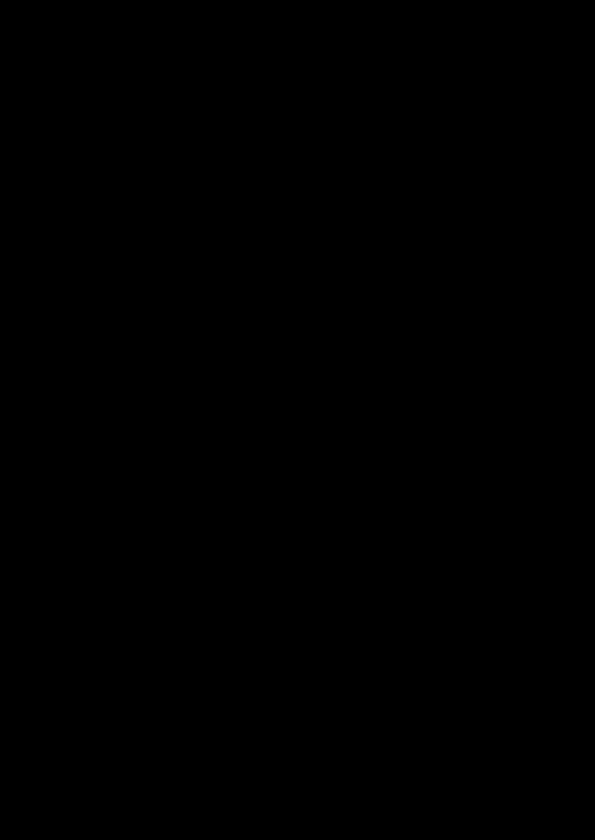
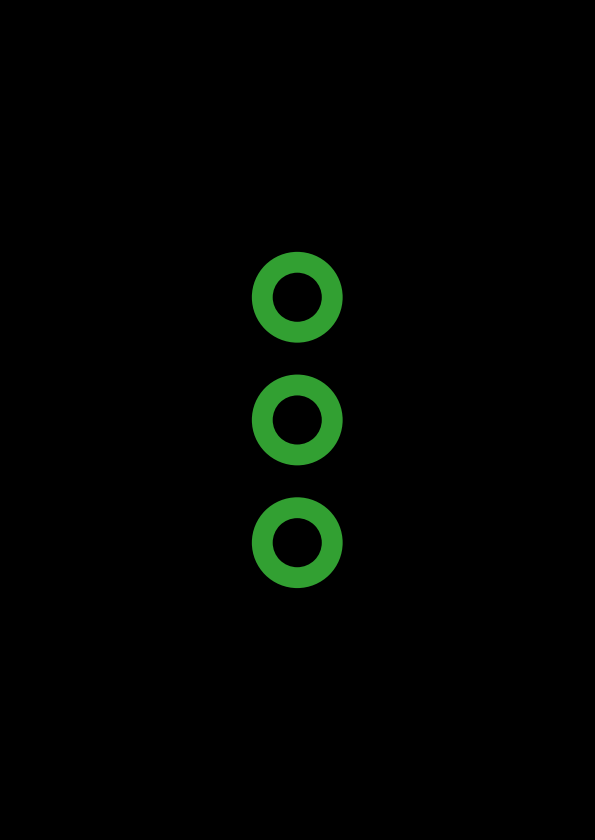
part: none -> (297, 419)

